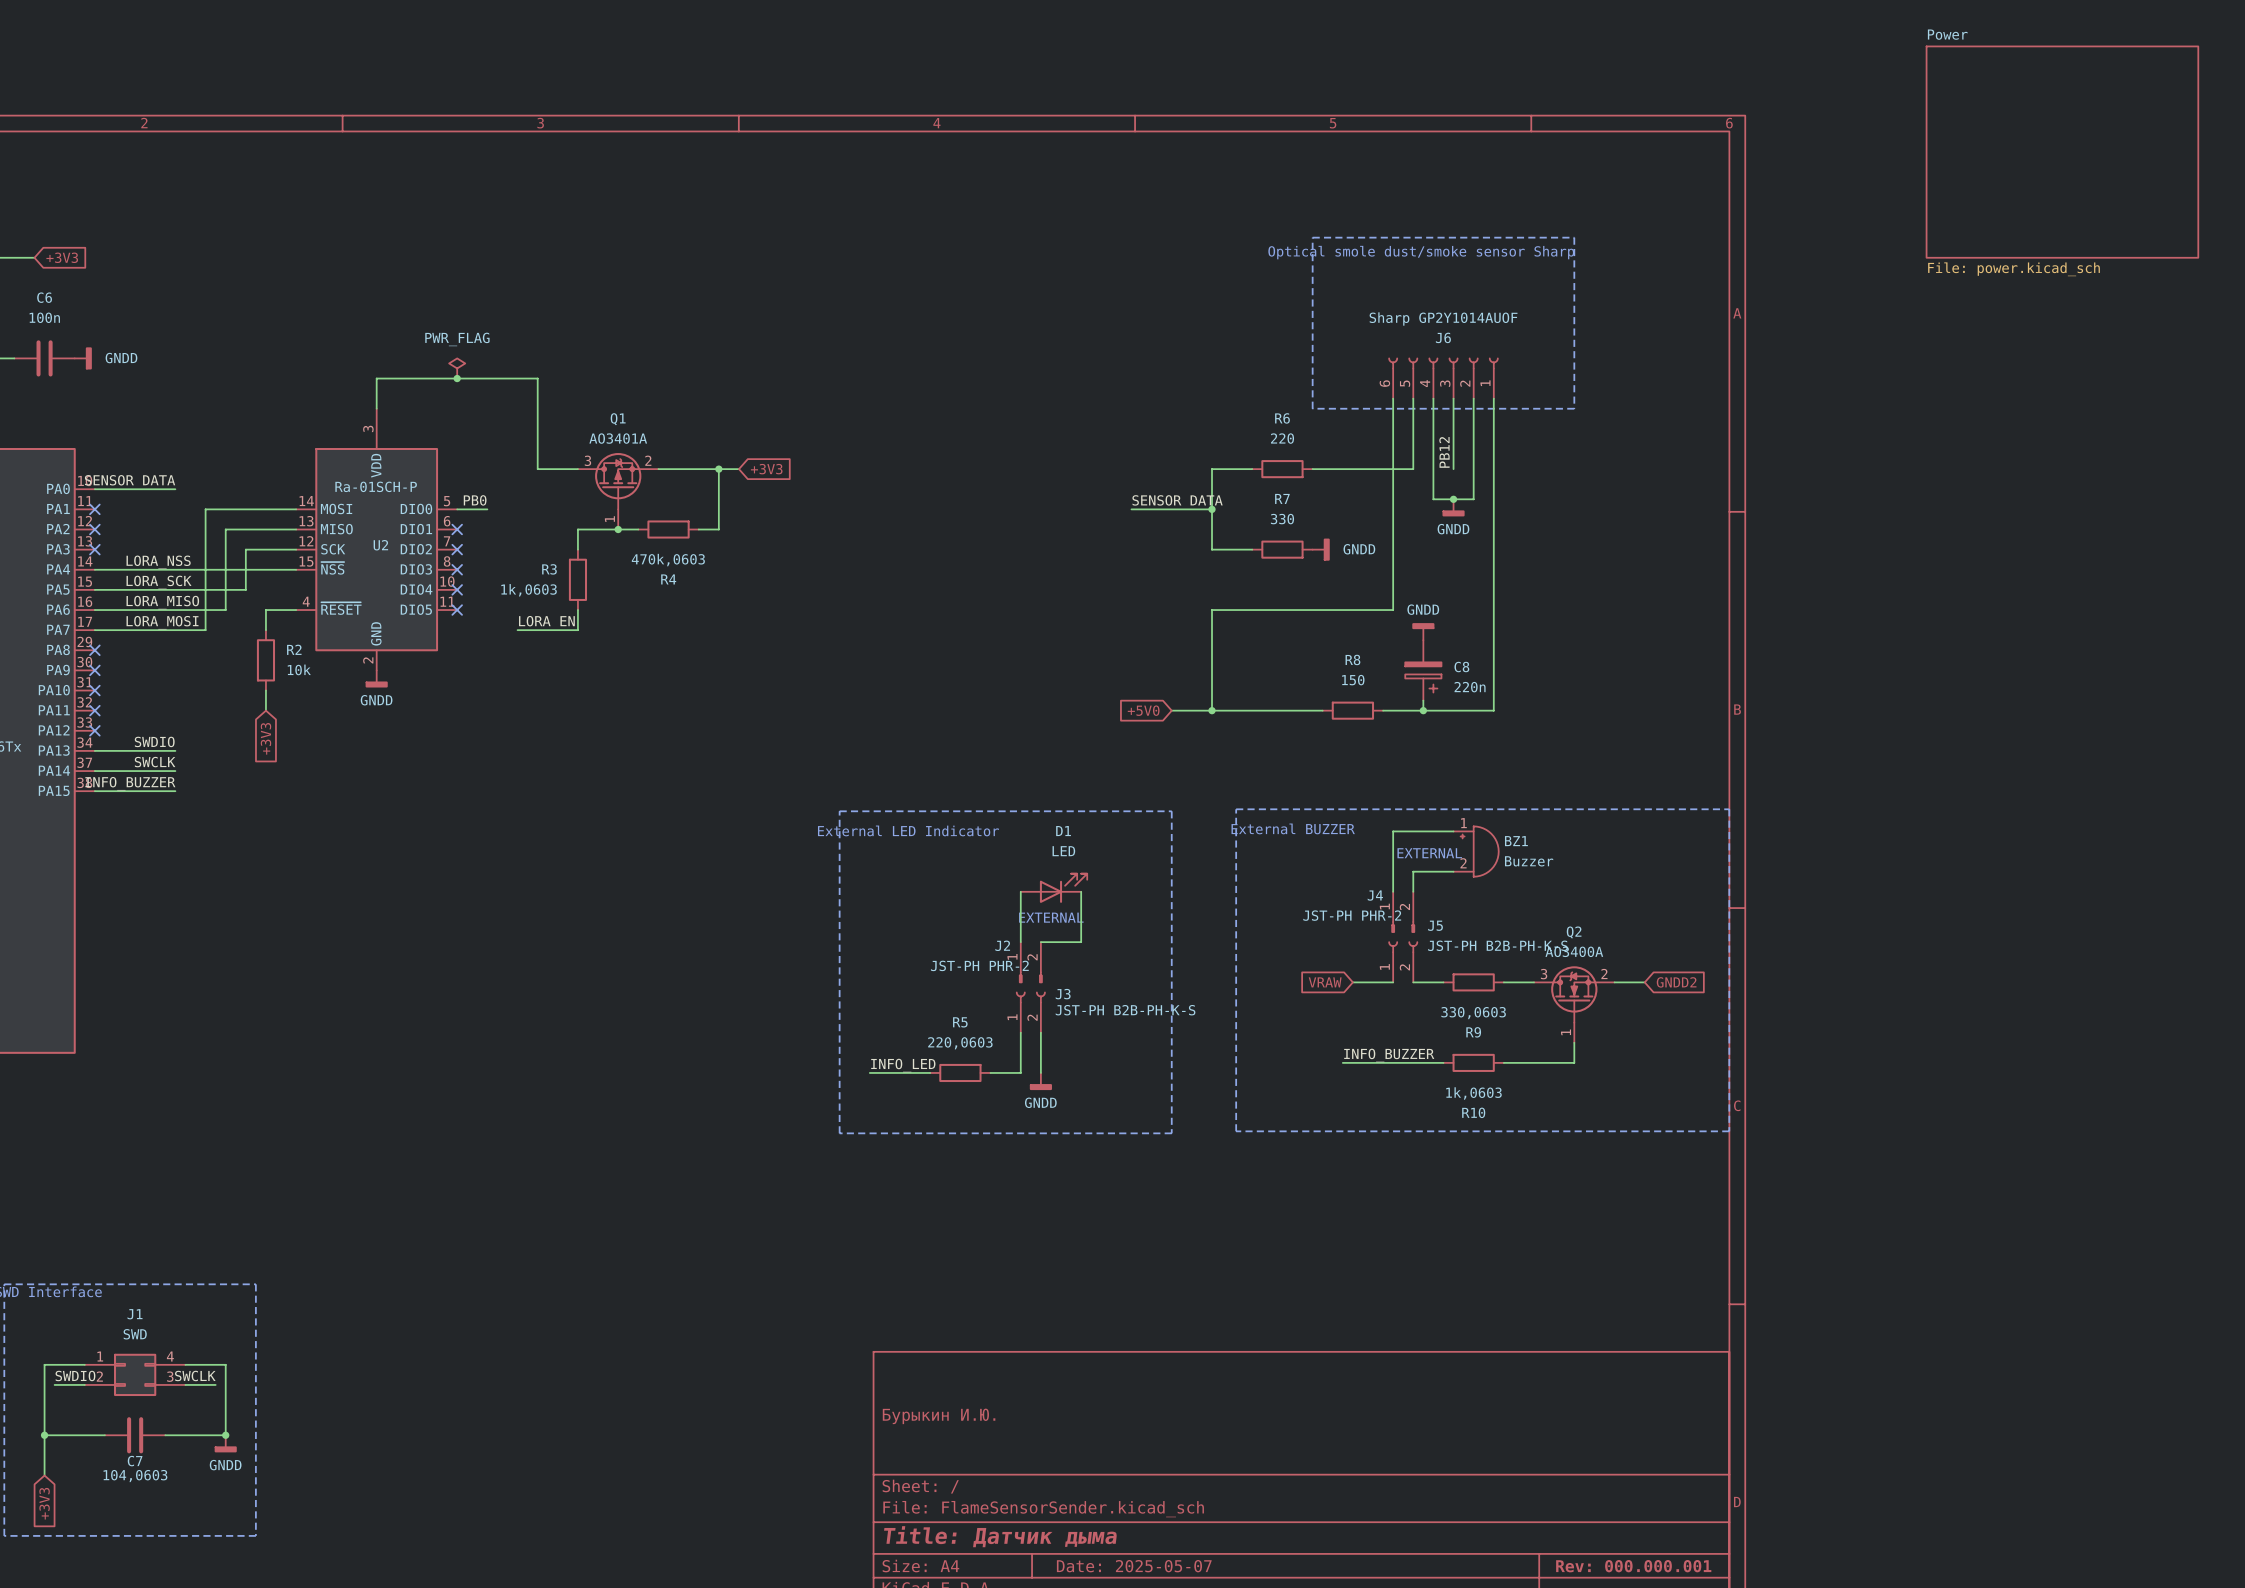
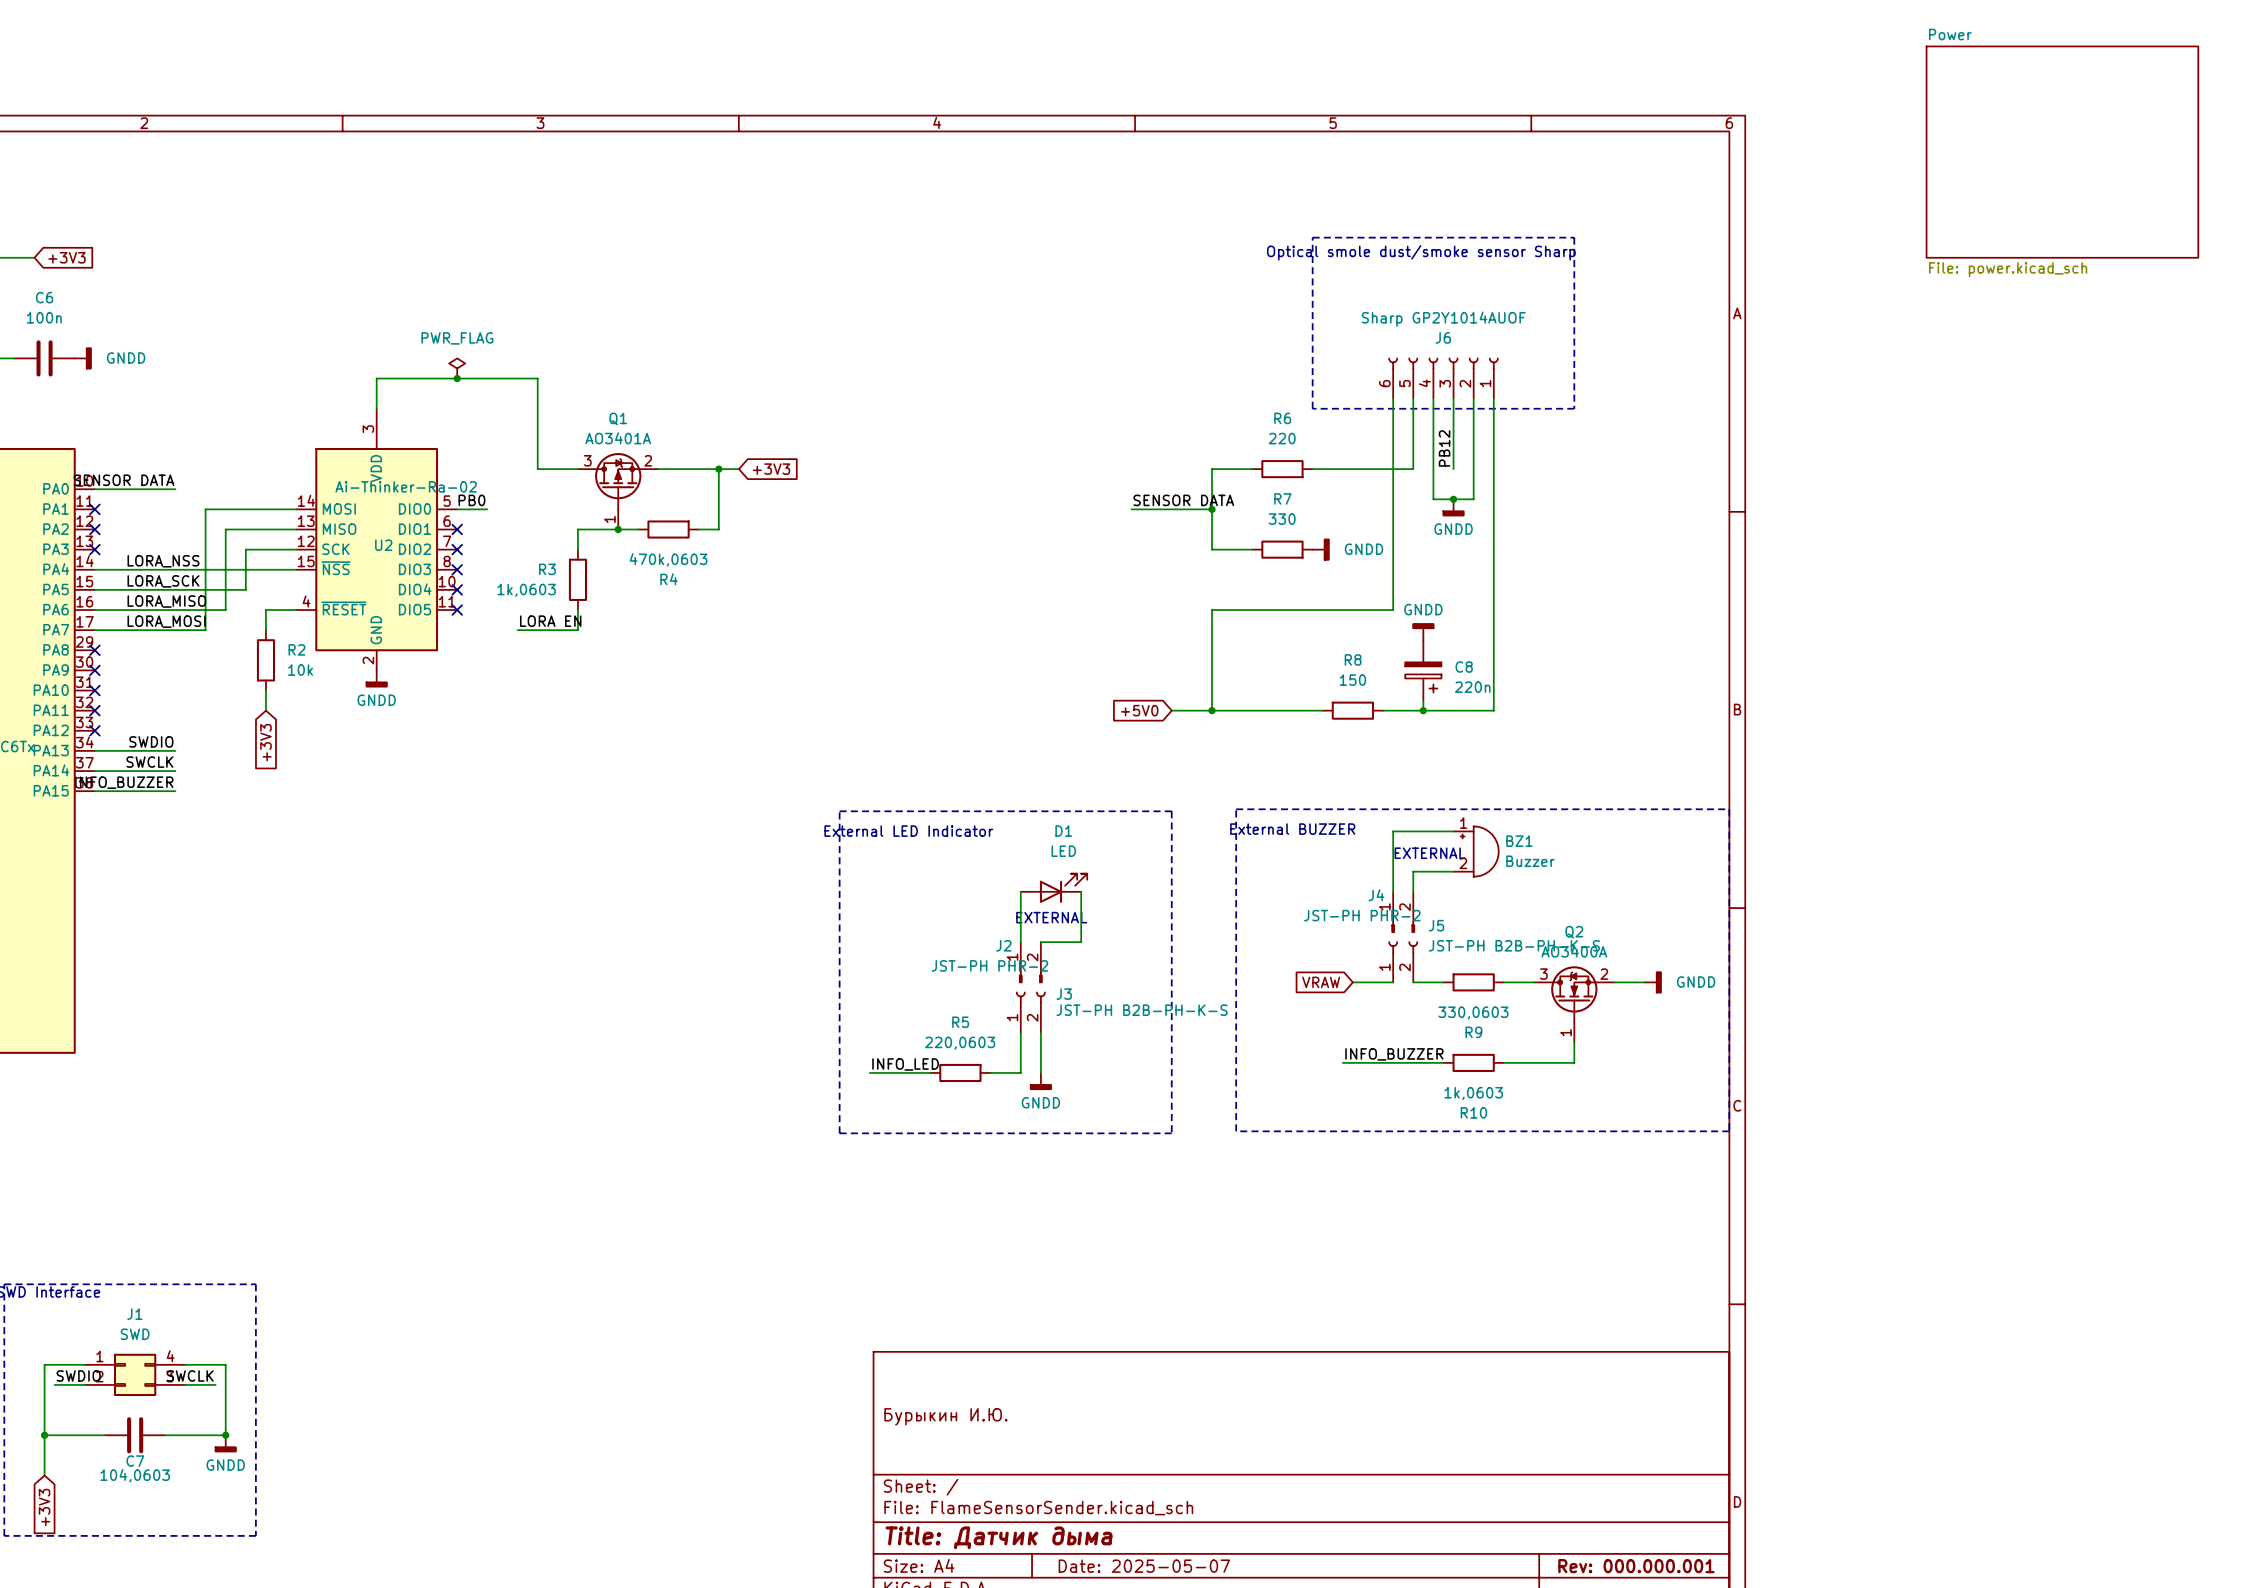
U2 value: Ra-01SCH-P (376, 486) -> Ai-Thinker-Ra-02 (406, 486)
power symbol: none -> GNDD (1653, 982)
global label: GNDD2 (1676, 982) -> none

